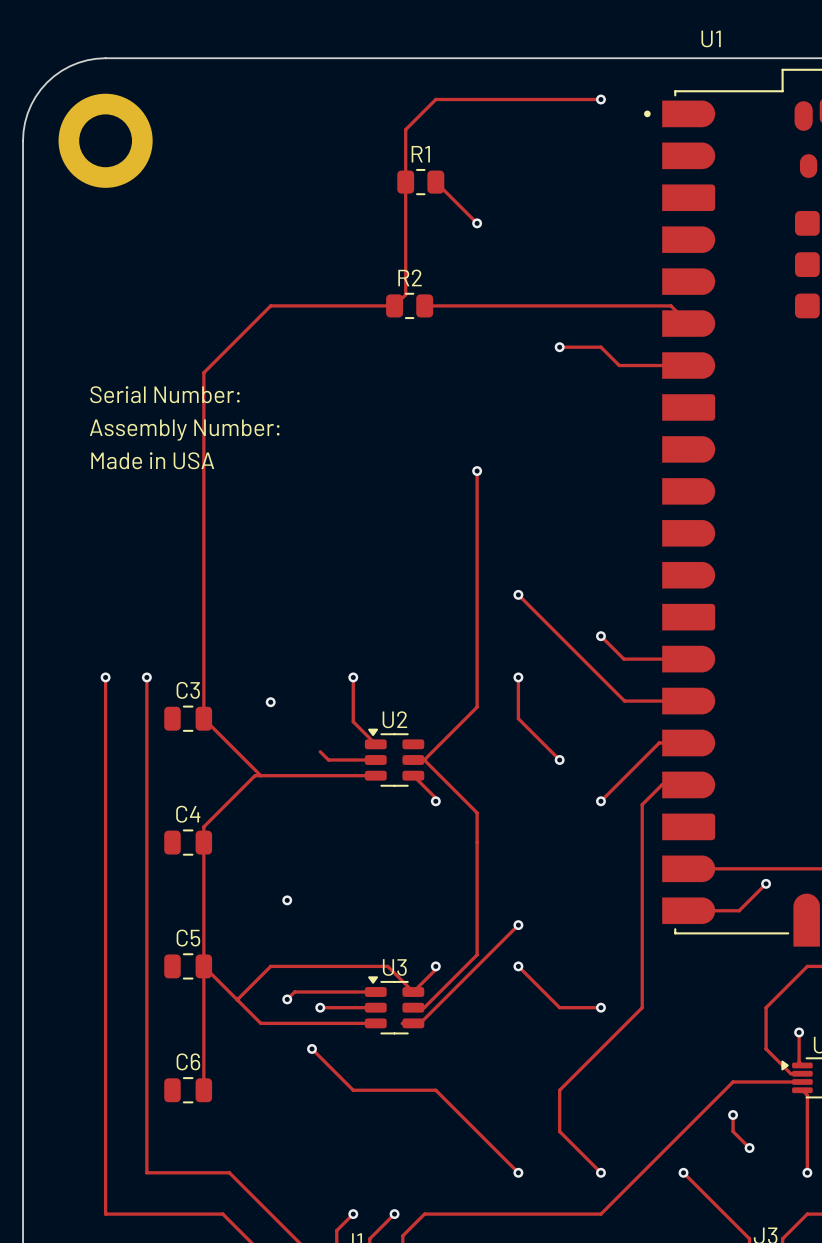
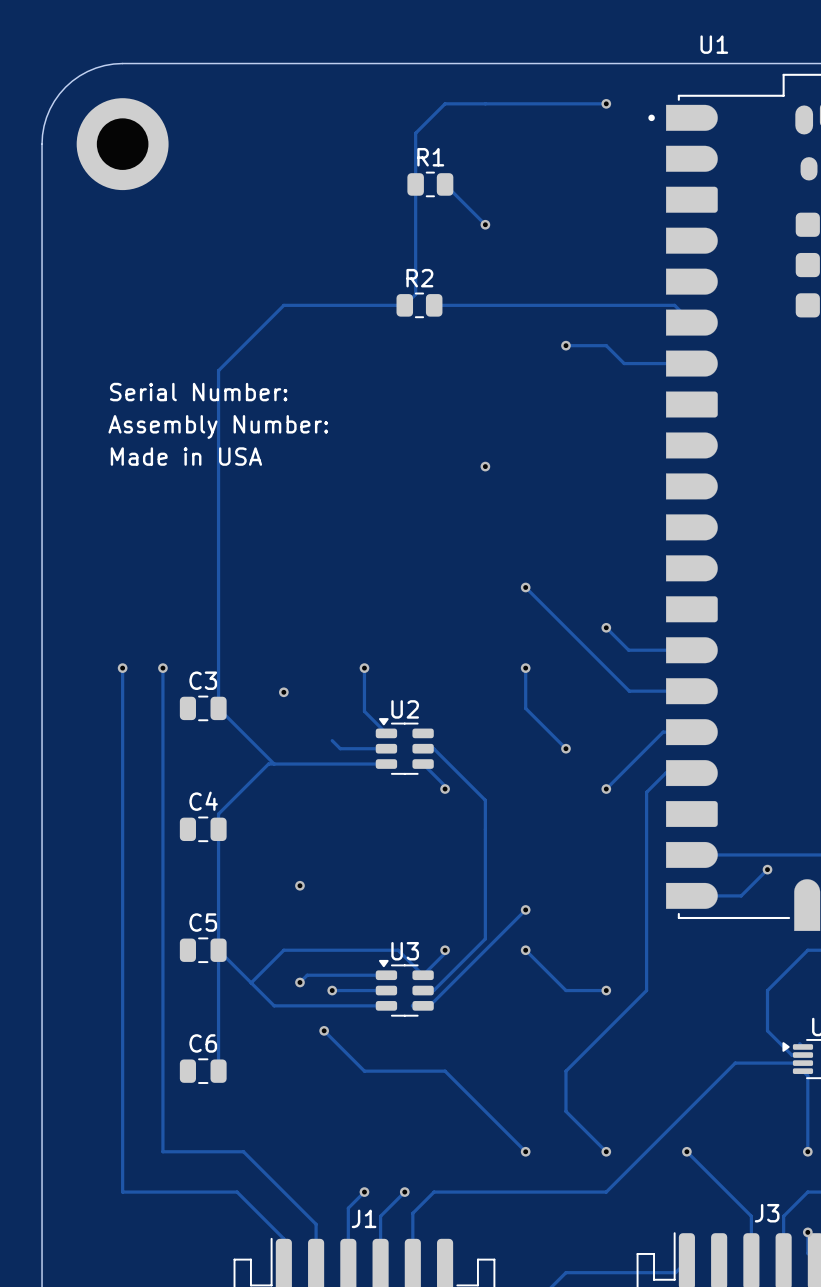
track: (477, 471) (477, 707) (424, 760) -> none
track: (799, 1032) (799, 1062) -> none
via: (799, 1032) -> none
track: (733, 1115) (733, 1131) (749, 1148) -> none
via: (733, 1115) -> none
via: (749, 1148) -> none

